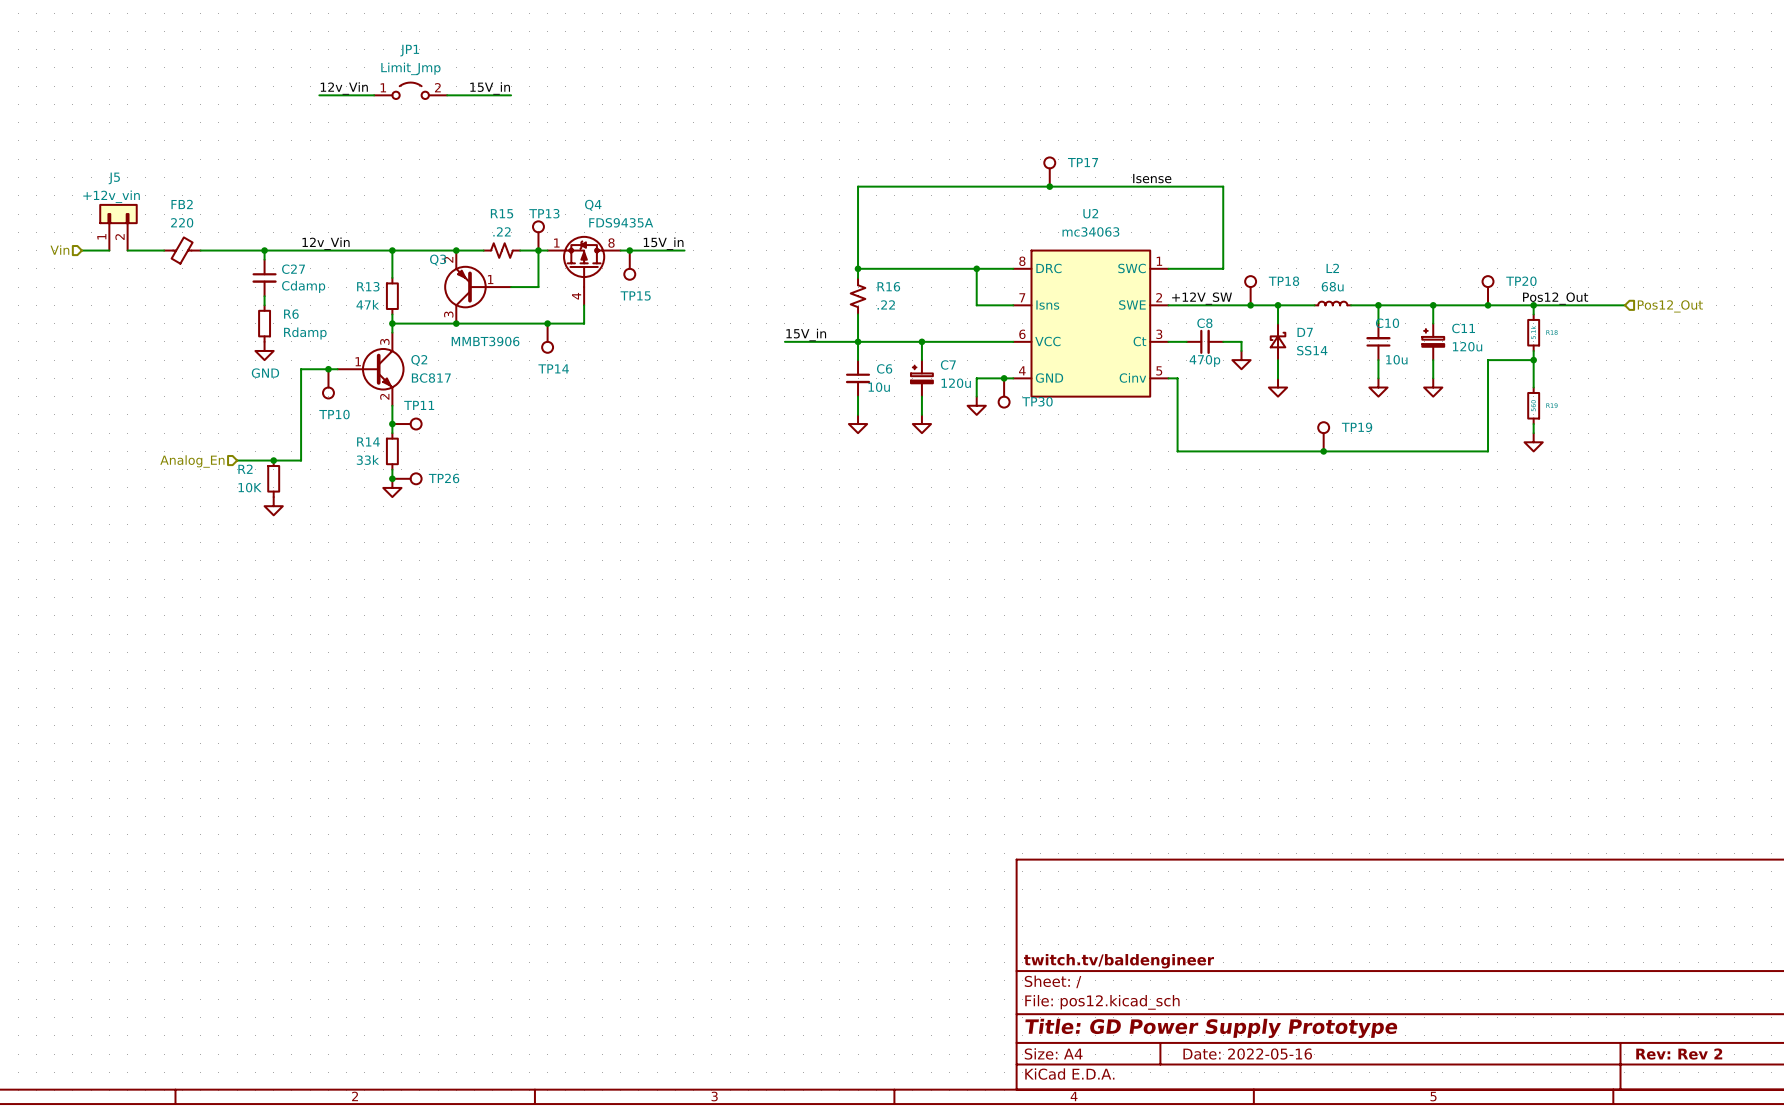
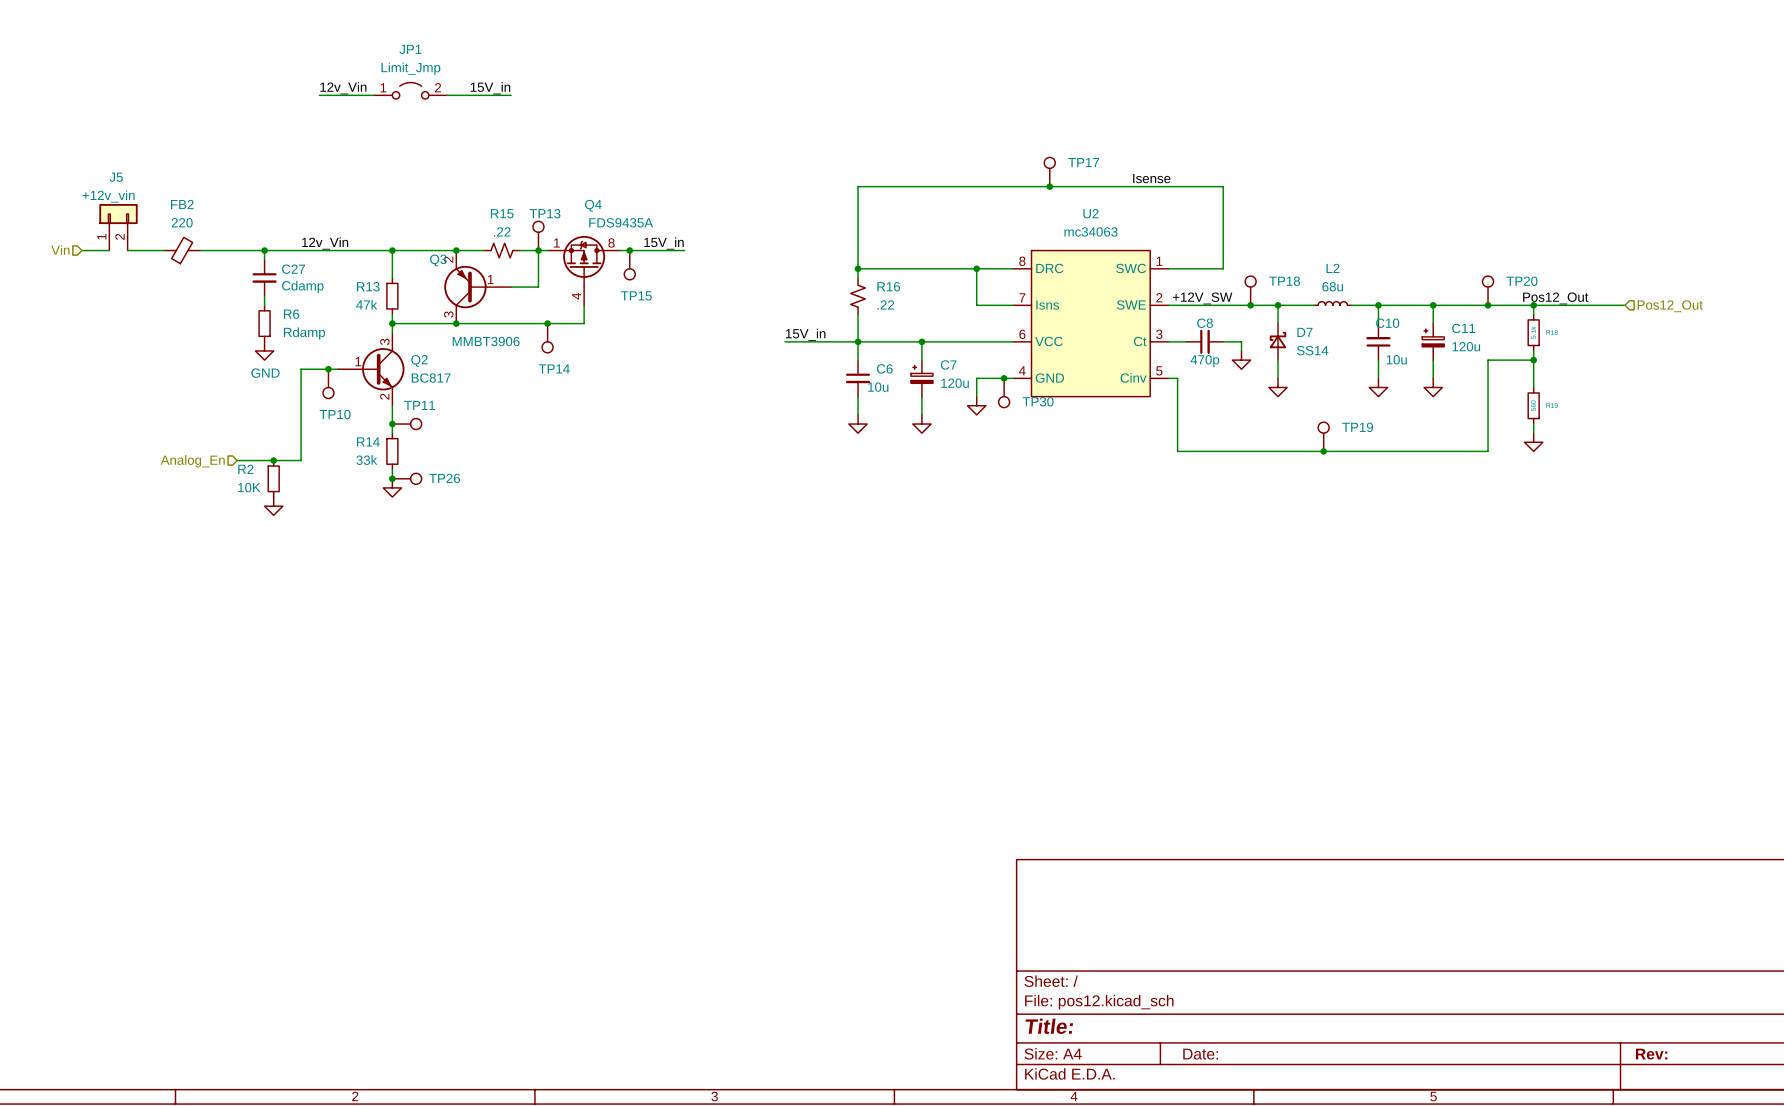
title block: twitch.tv/baldengineer (1119, 961) -> none
title block: Title: GD Power Supply Prototype (1211, 1028) -> Title: (1049, 1026)
title block: Date: 2022-05-16 (1247, 1054) -> Date: (1200, 1054)
title block: Rev: Rev 2 (1679, 1054) -> Rev: (1651, 1054)

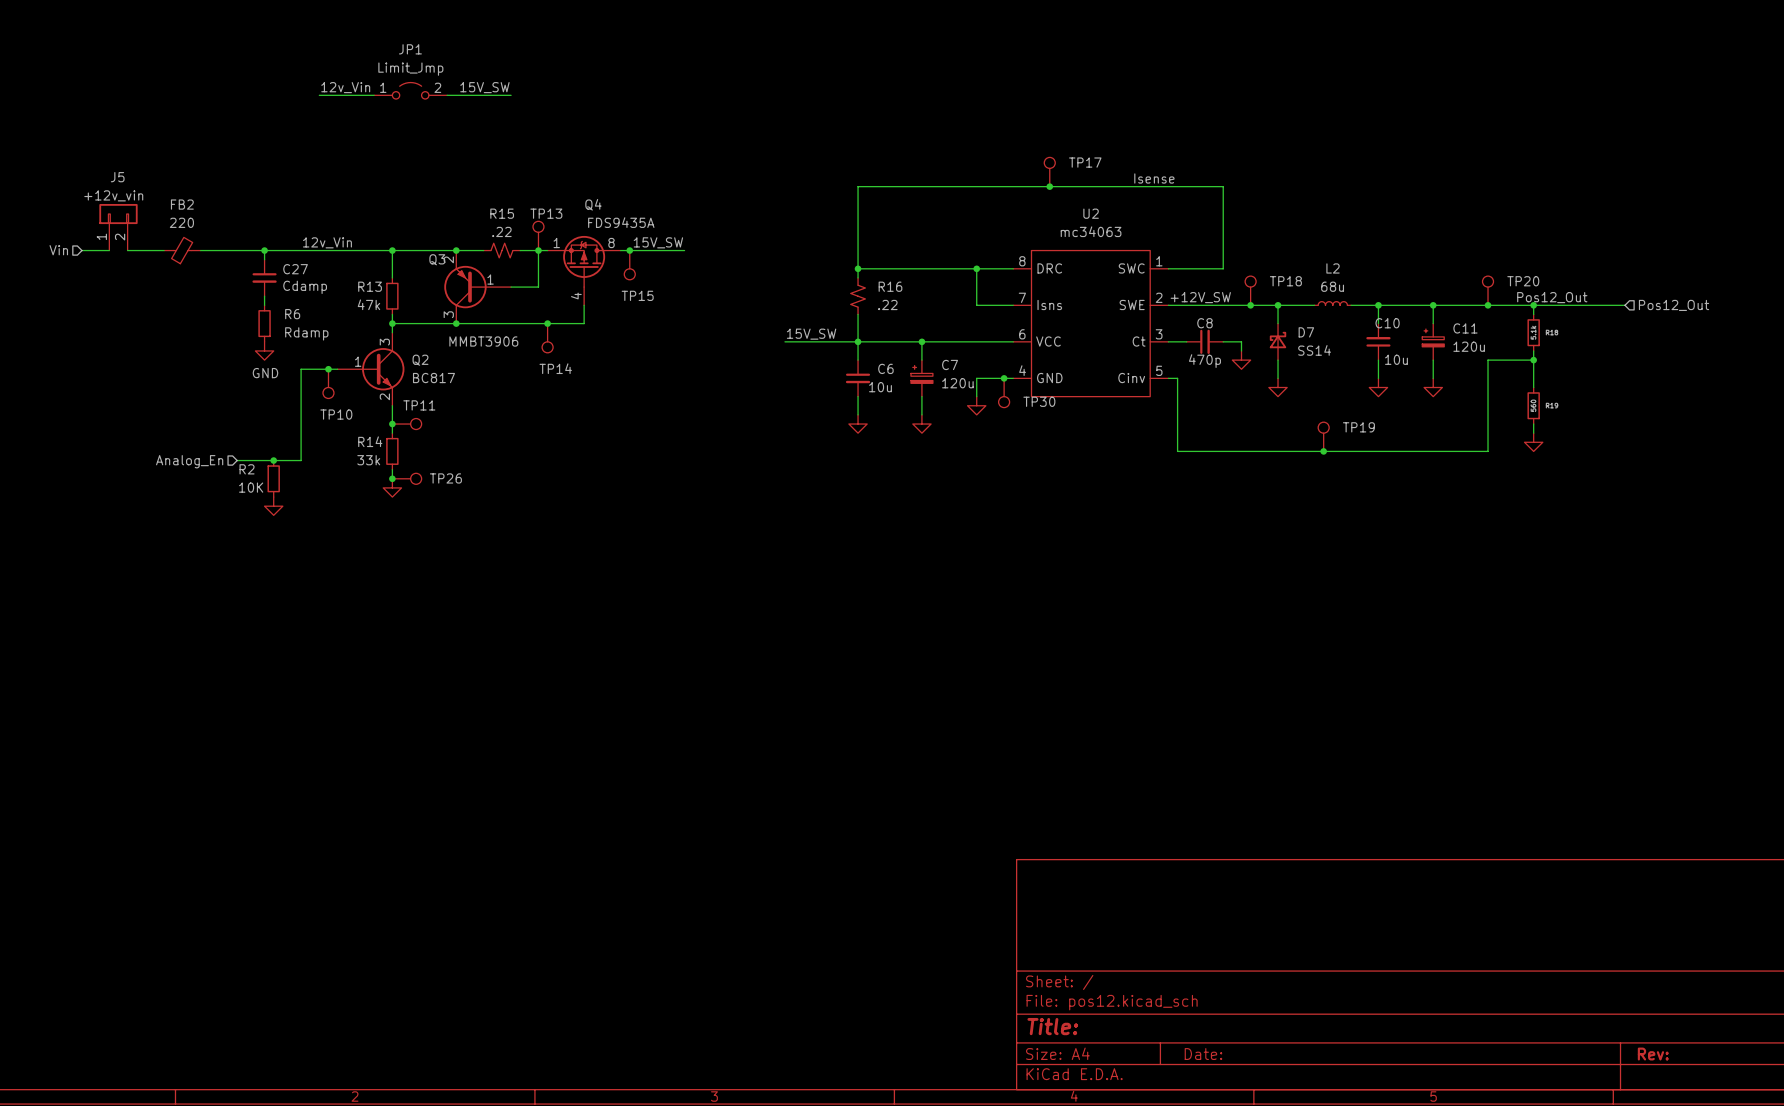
label: 15V_in (490, 88) -> 15V_SW (484, 87)
label: 15V_in (663, 243) -> 15V_SW (658, 242)
label: 15V_in (805, 334) -> 15V_SW (811, 334)

